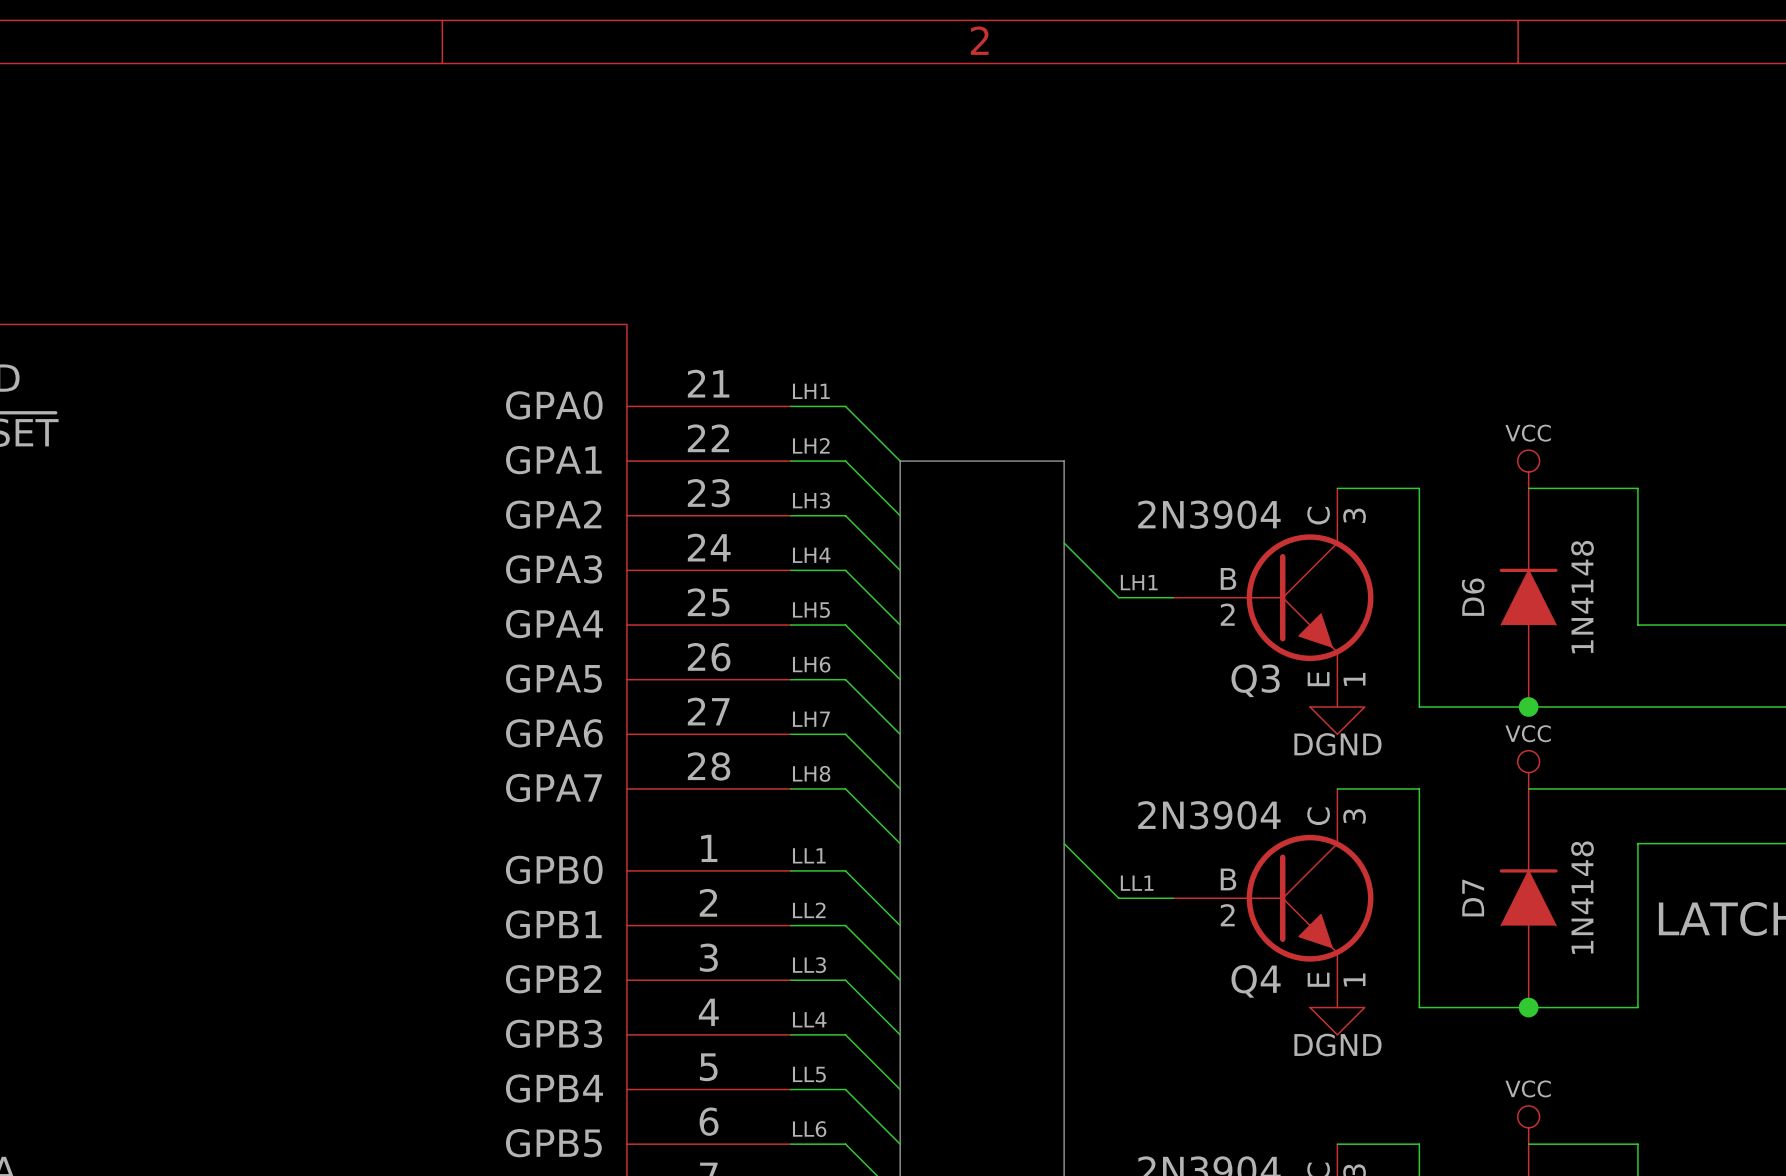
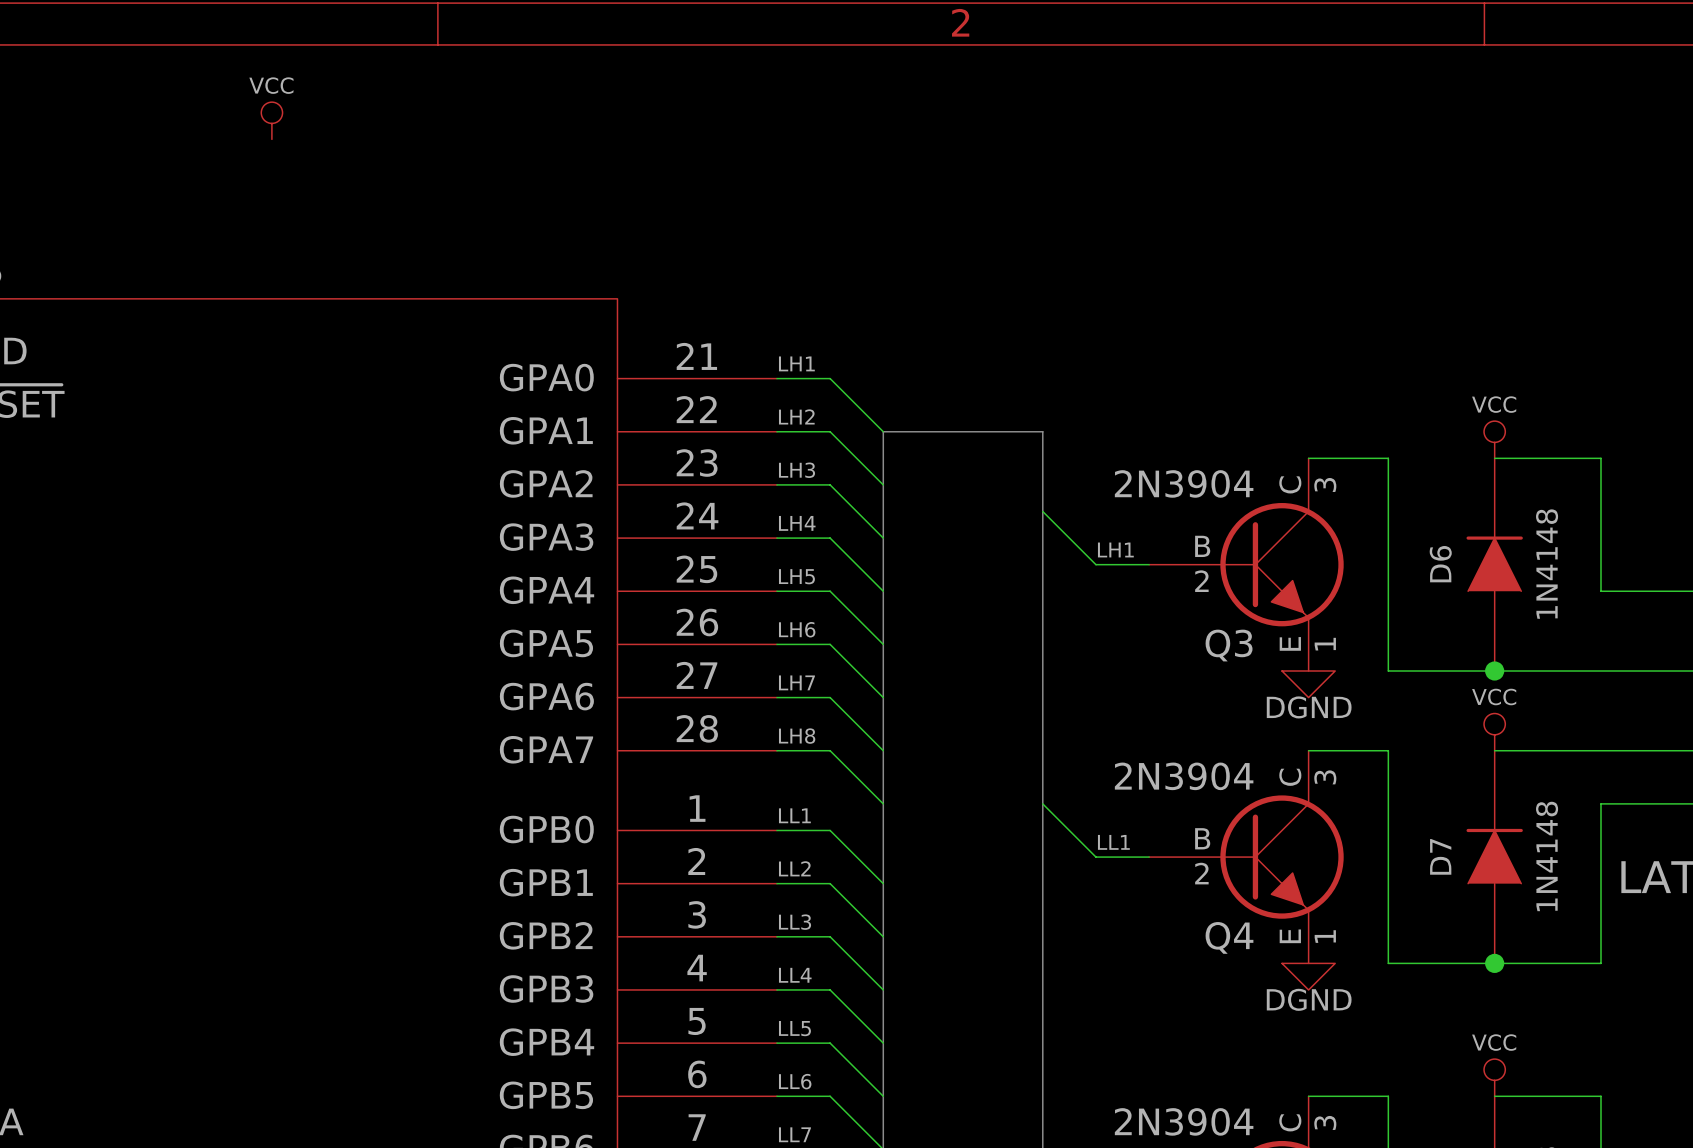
power symbol: none -> VCC (271, 120)

